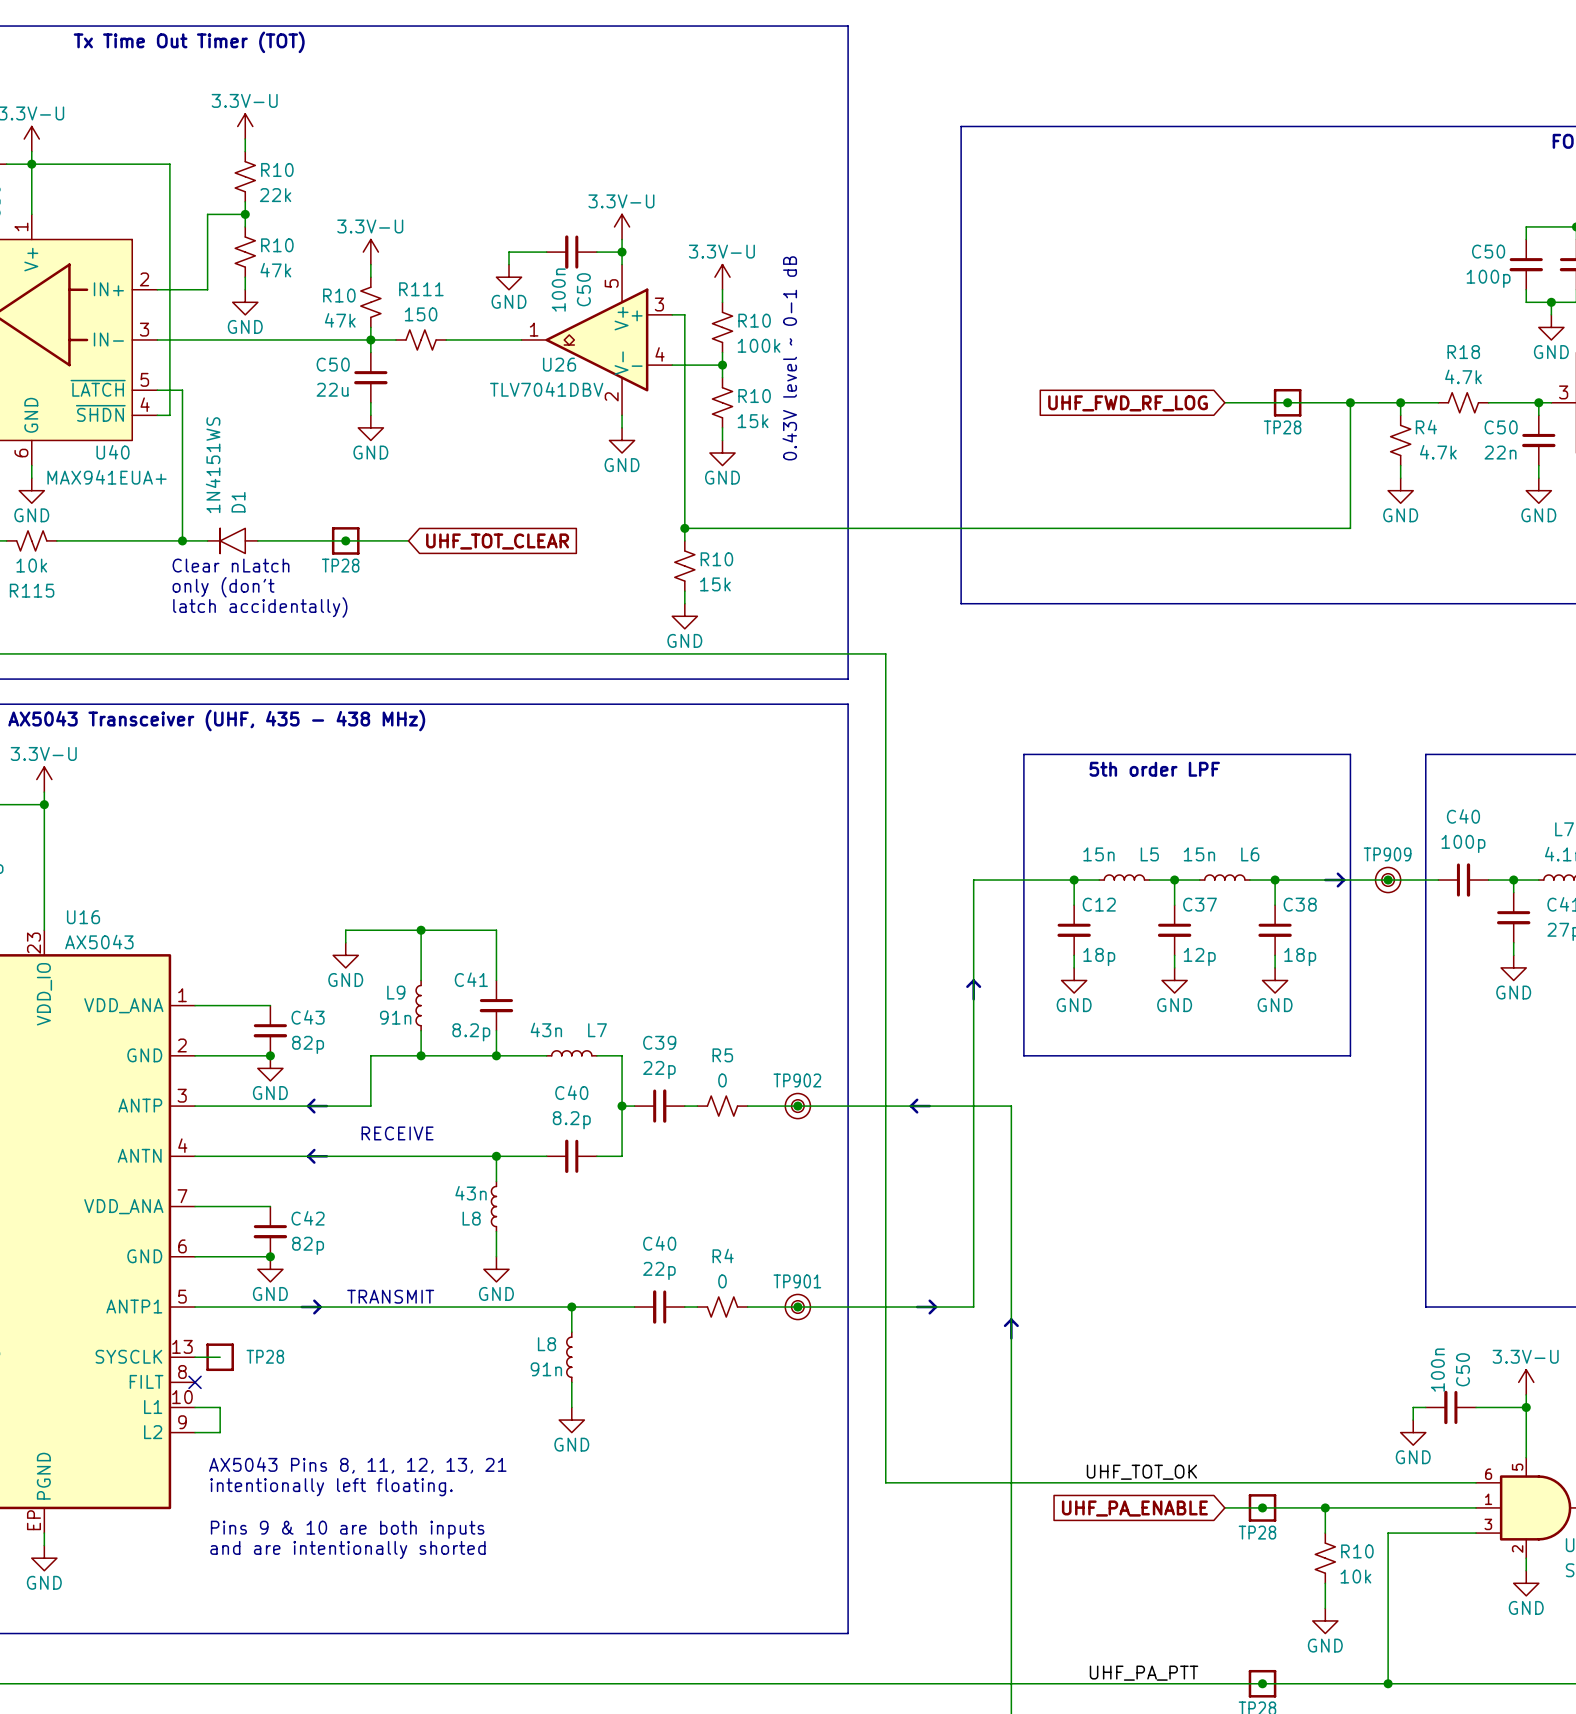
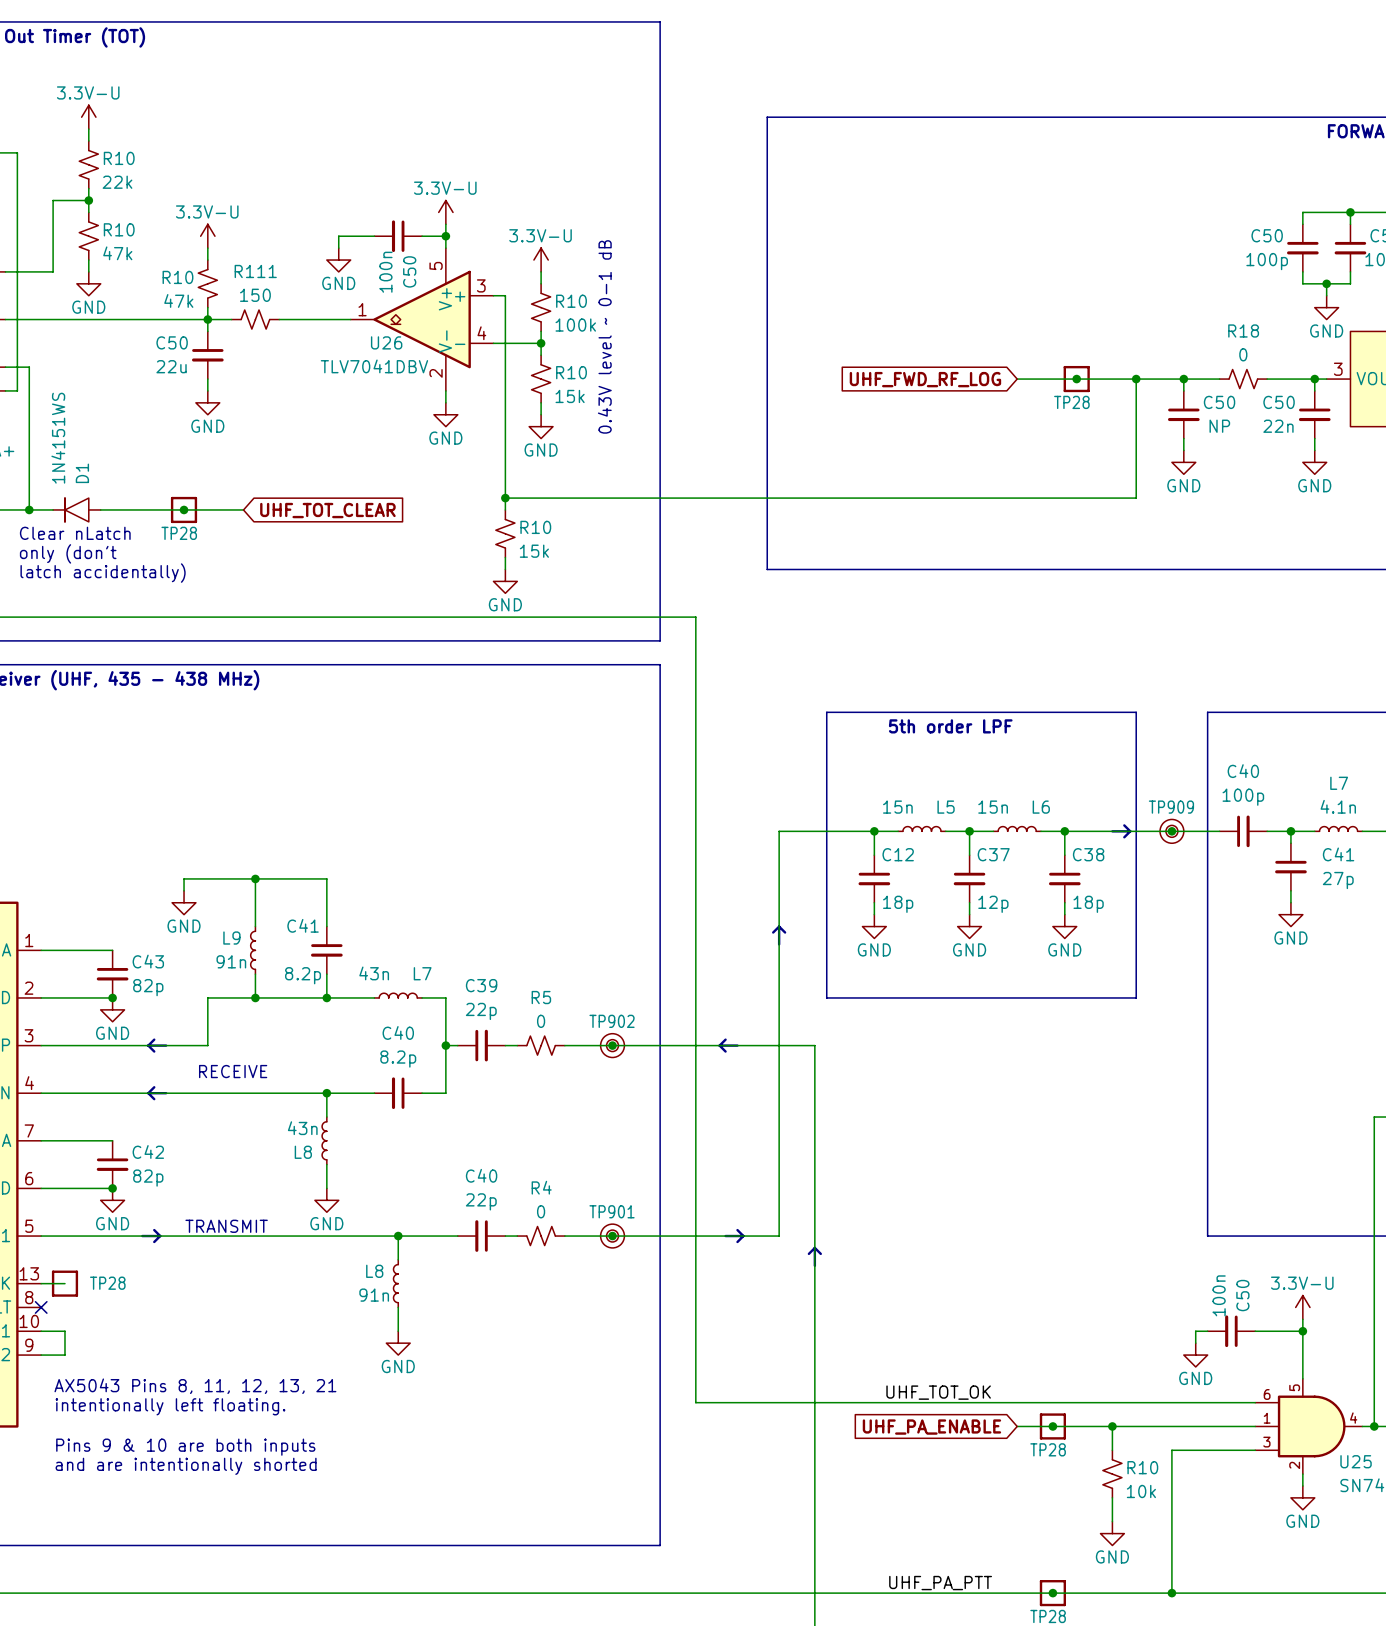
R18 value: 4.7k (1463, 376) -> 0 (1243, 354)
R4: 4.7k (1400, 440) -> none
C50: none -> NP (1183, 414)

